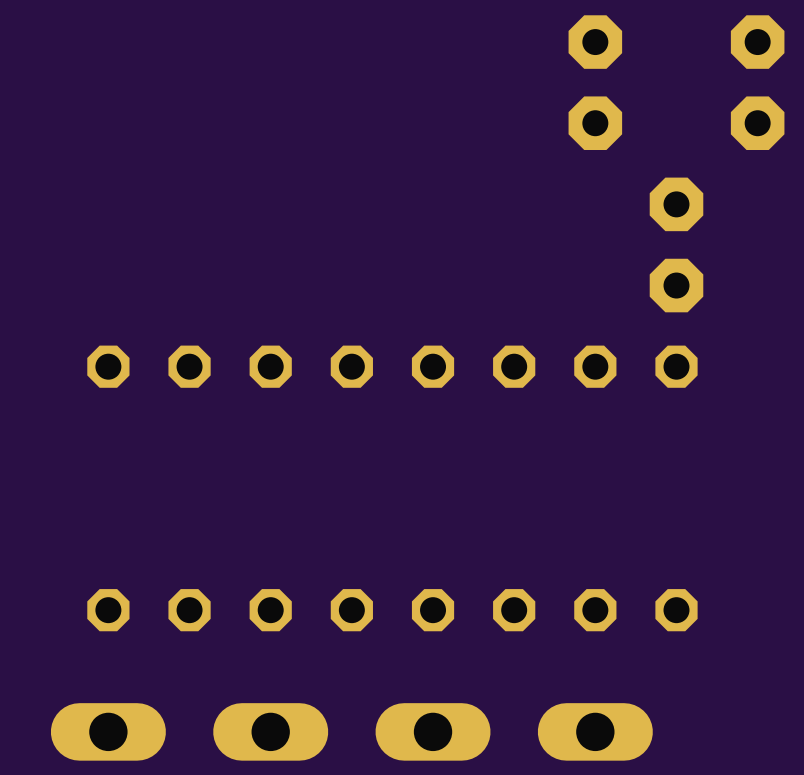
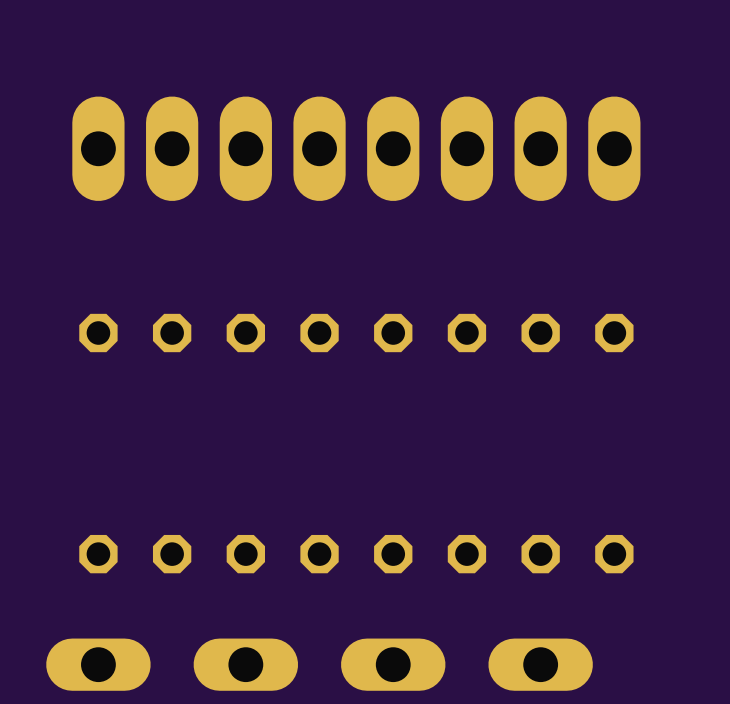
part: (595, 82) -> none
part: (757, 82) -> none
part: none -> (356, 148)
part: (676, 244) -> none

